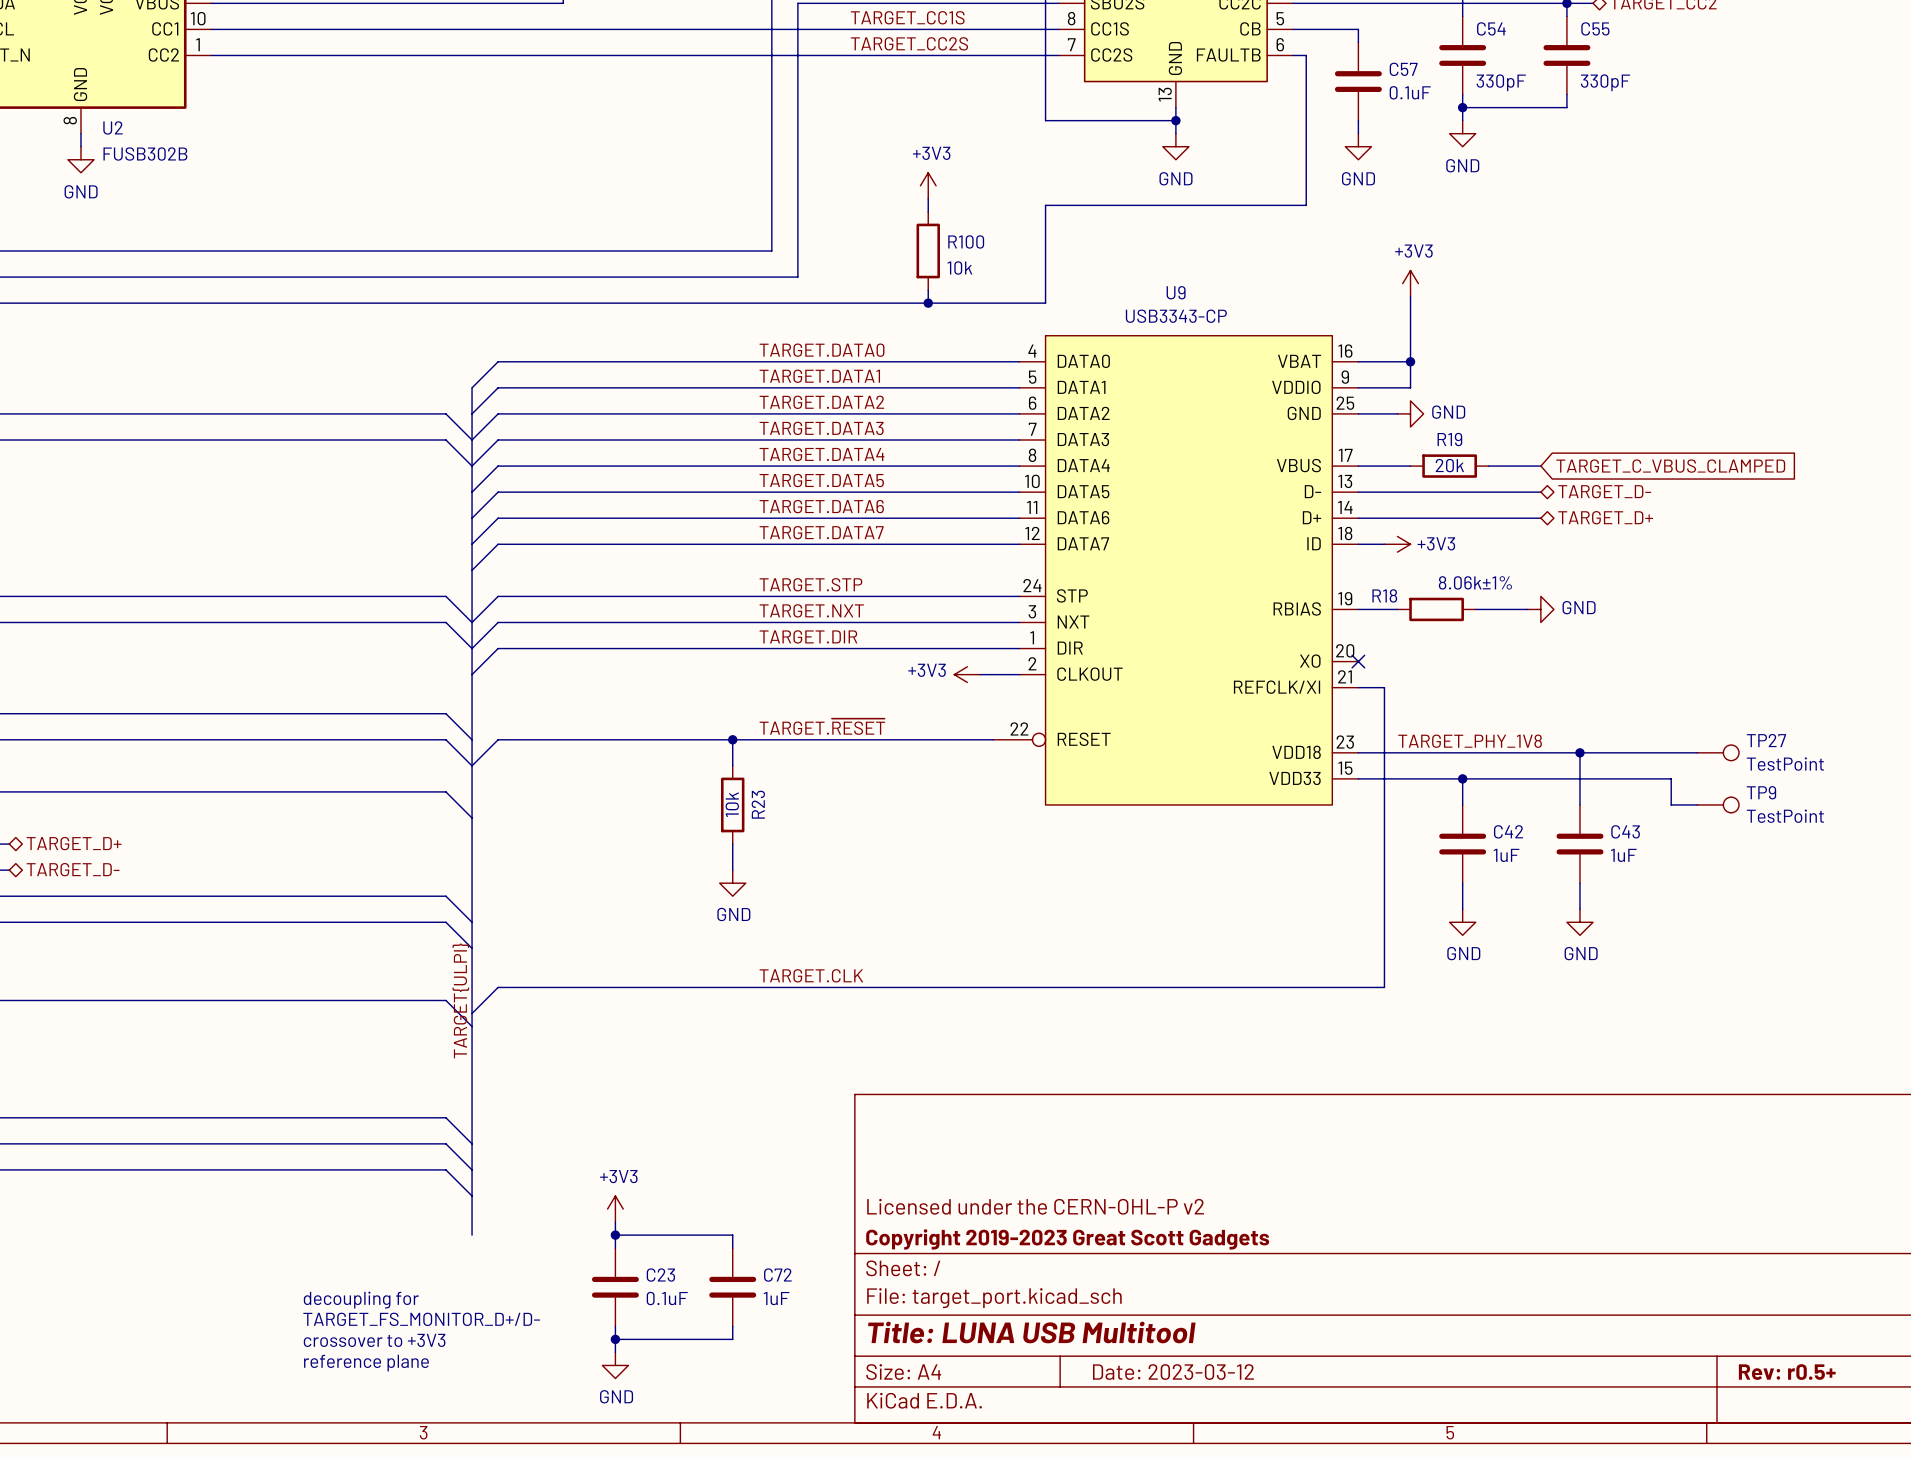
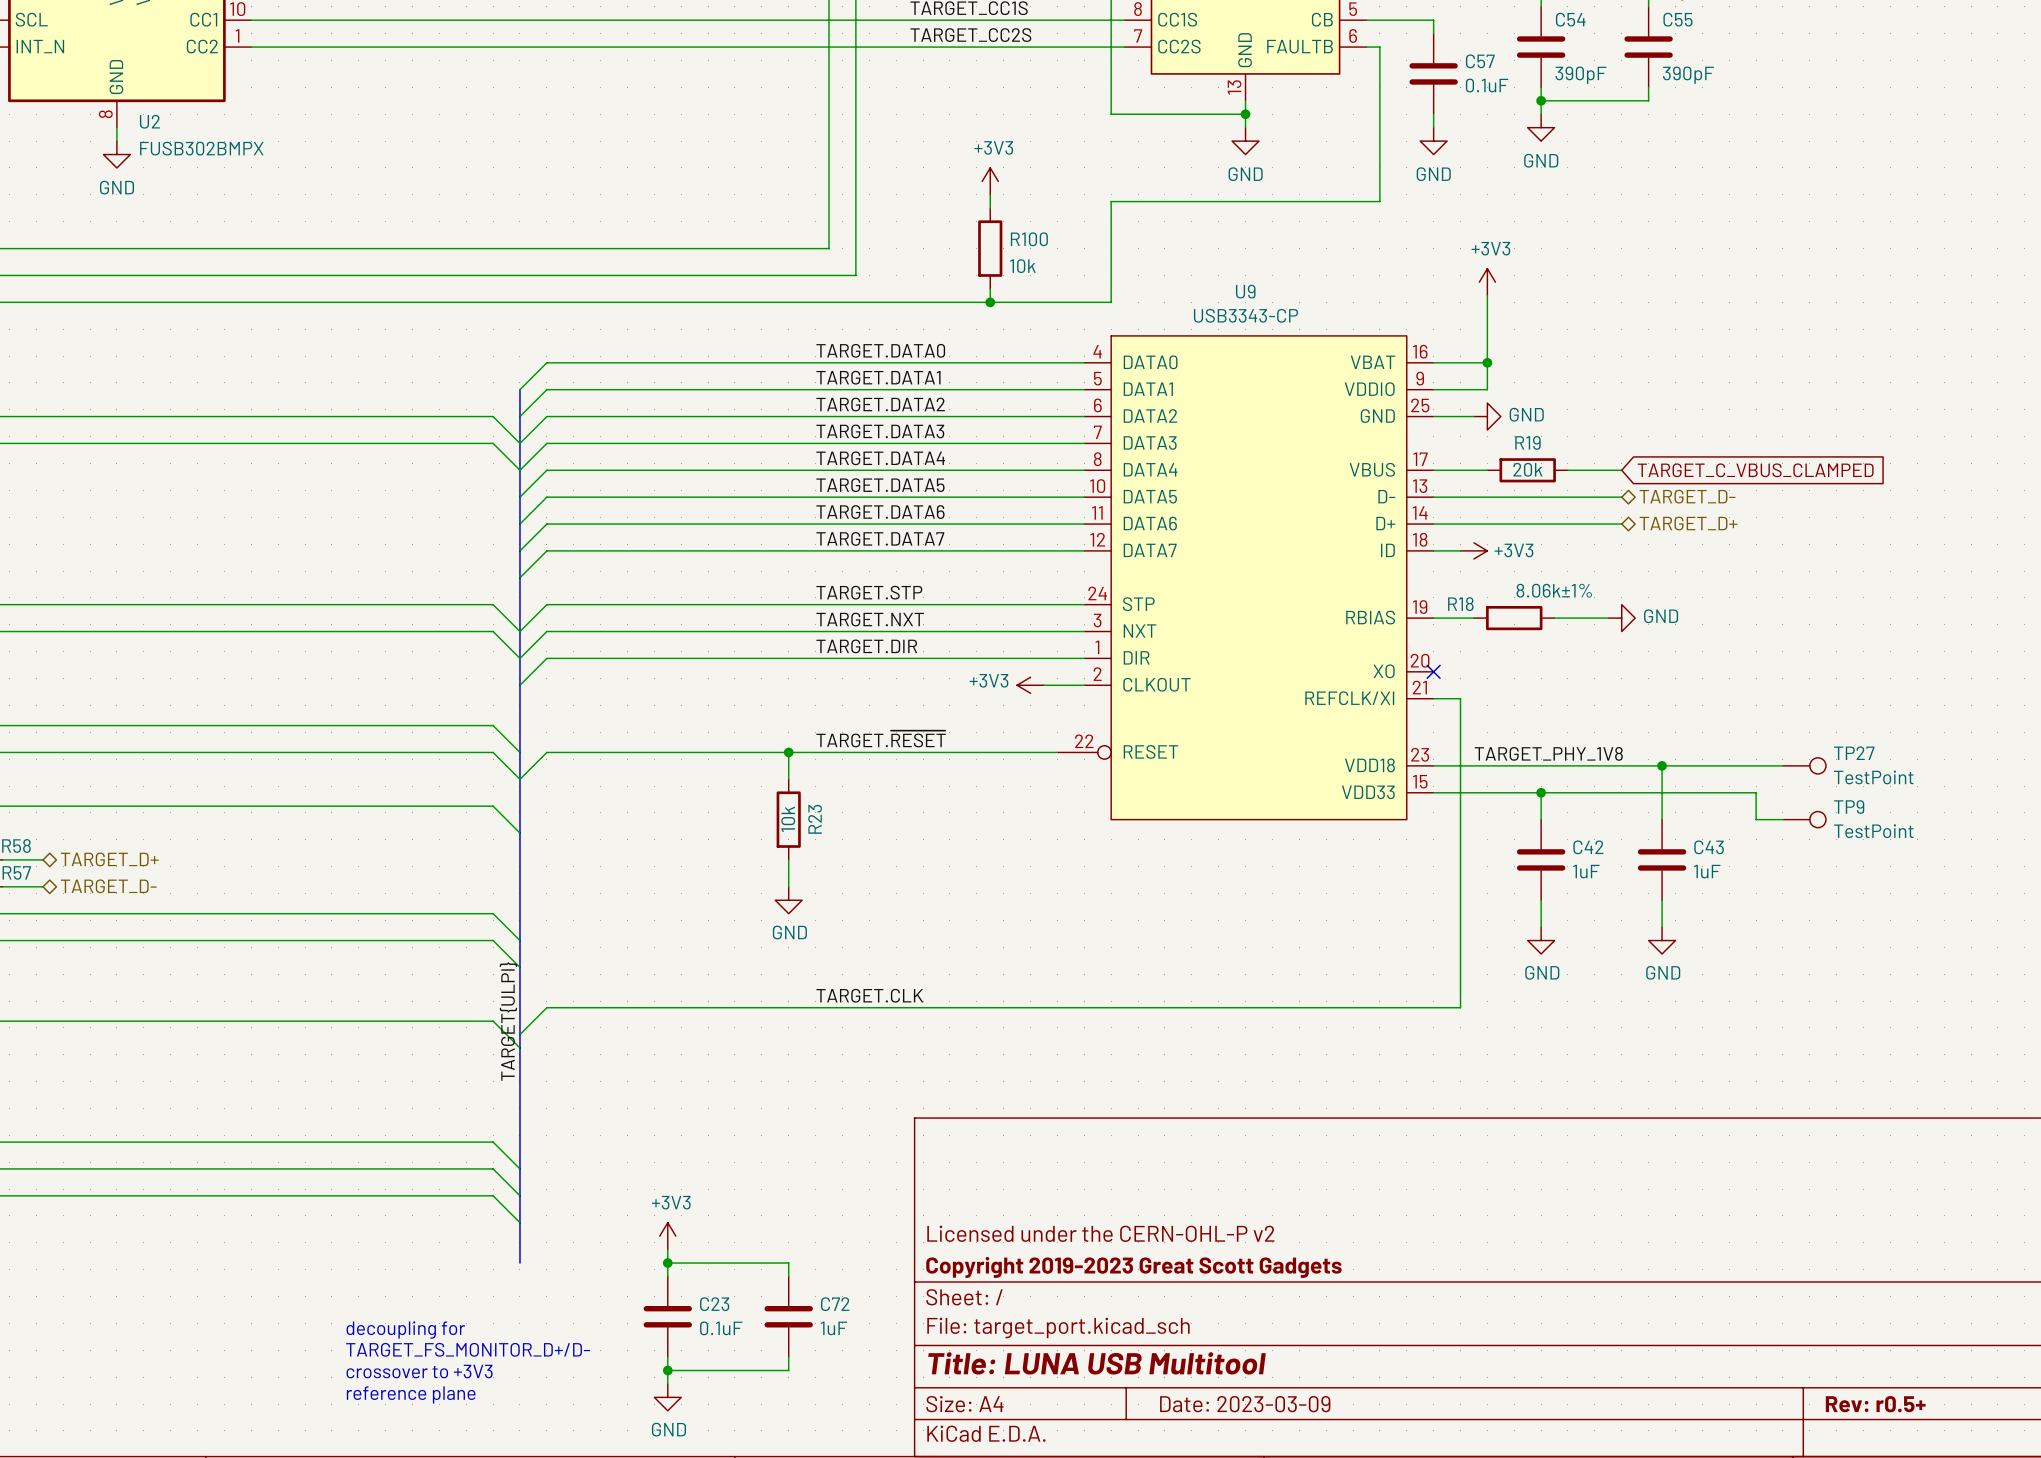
C54 value: 330pF (1501, 82) -> 390pF (1580, 75)
C55 value: 330pF (1605, 82) -> 390pF (1688, 75)
U2 value: FUSB302B (145, 154) -> FUSB302BMPX (201, 148)
title block: Date: 2023-03-12 (1173, 1372) -> Date: 2023-03-09 (1245, 1404)

